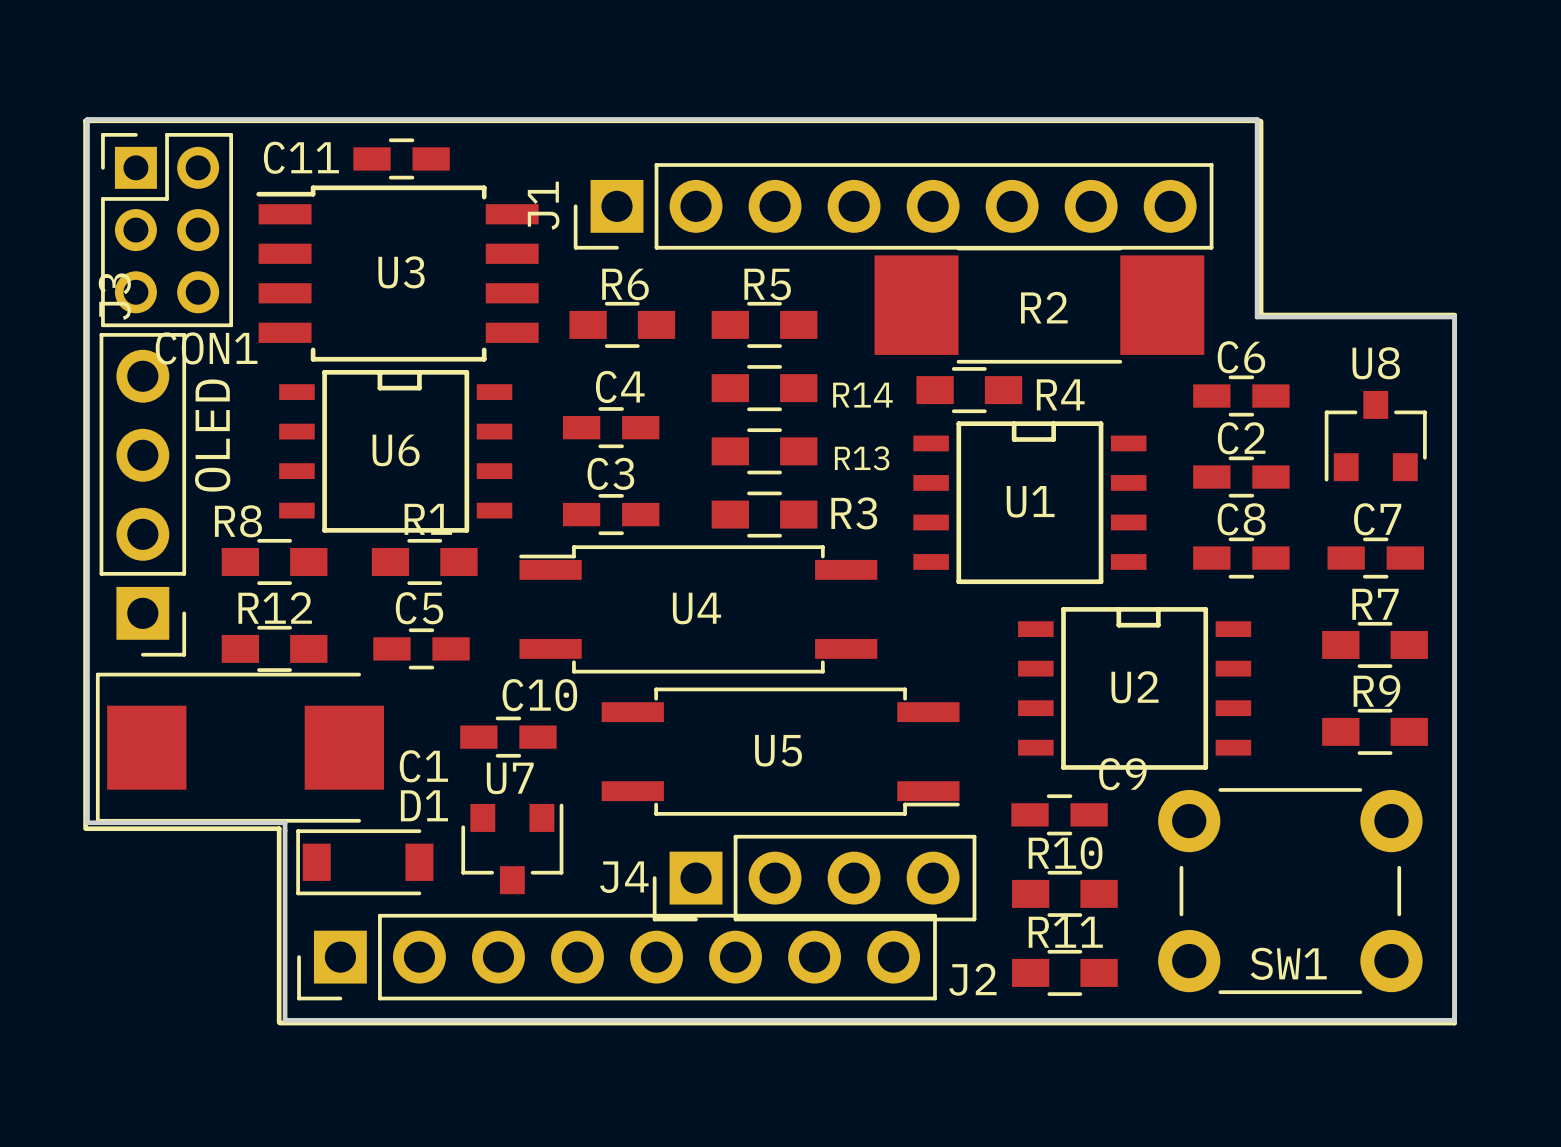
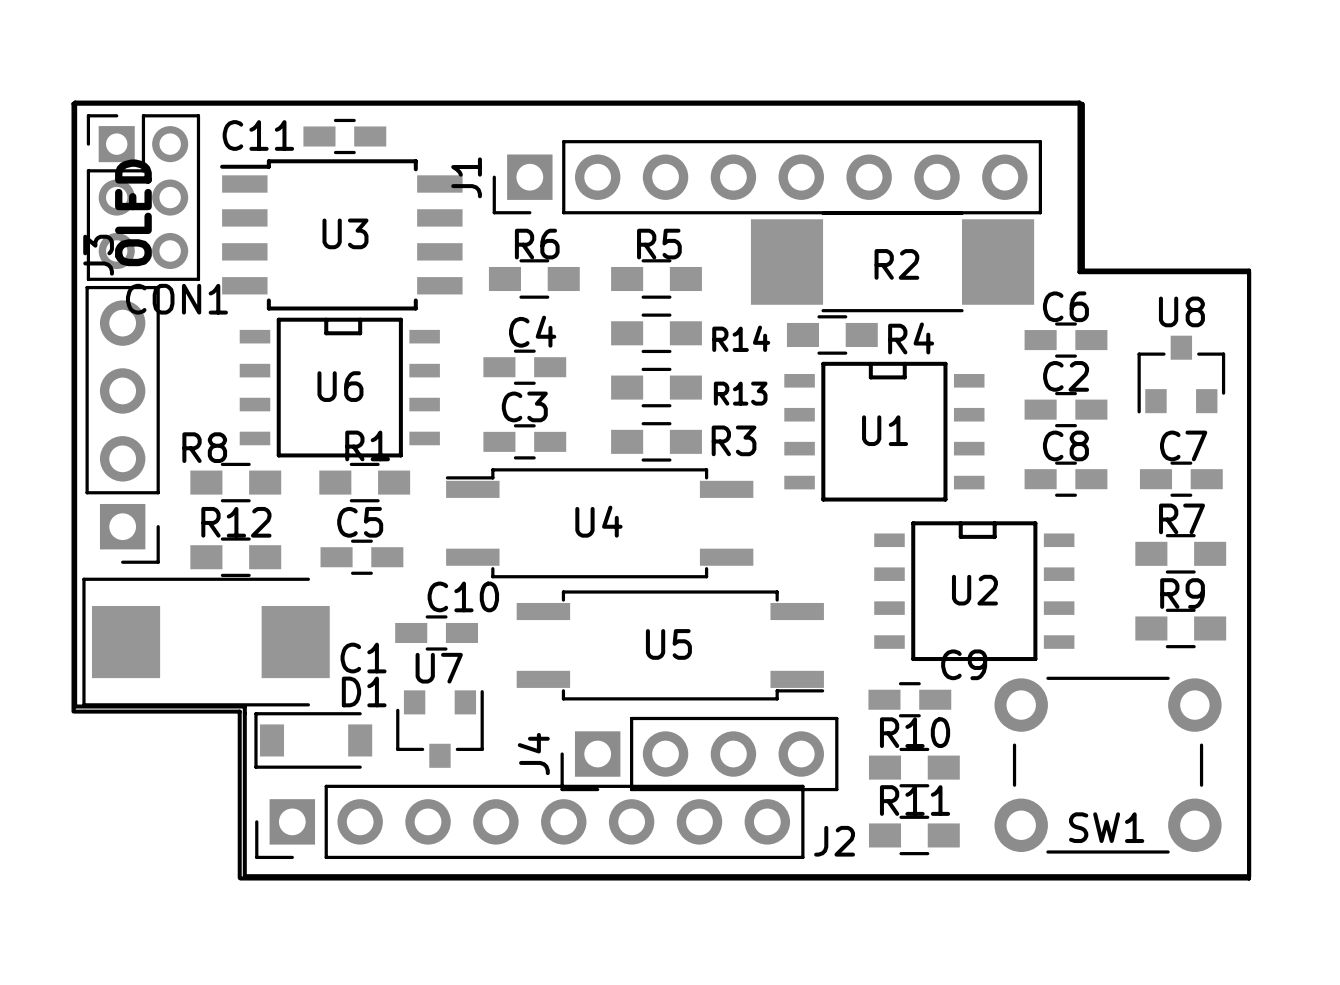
text position: OLED (212, 435) -> OLED (133, 212)
J4 name rotation: 0° (624, 877) -> 90° counterclockwise (533, 754)

